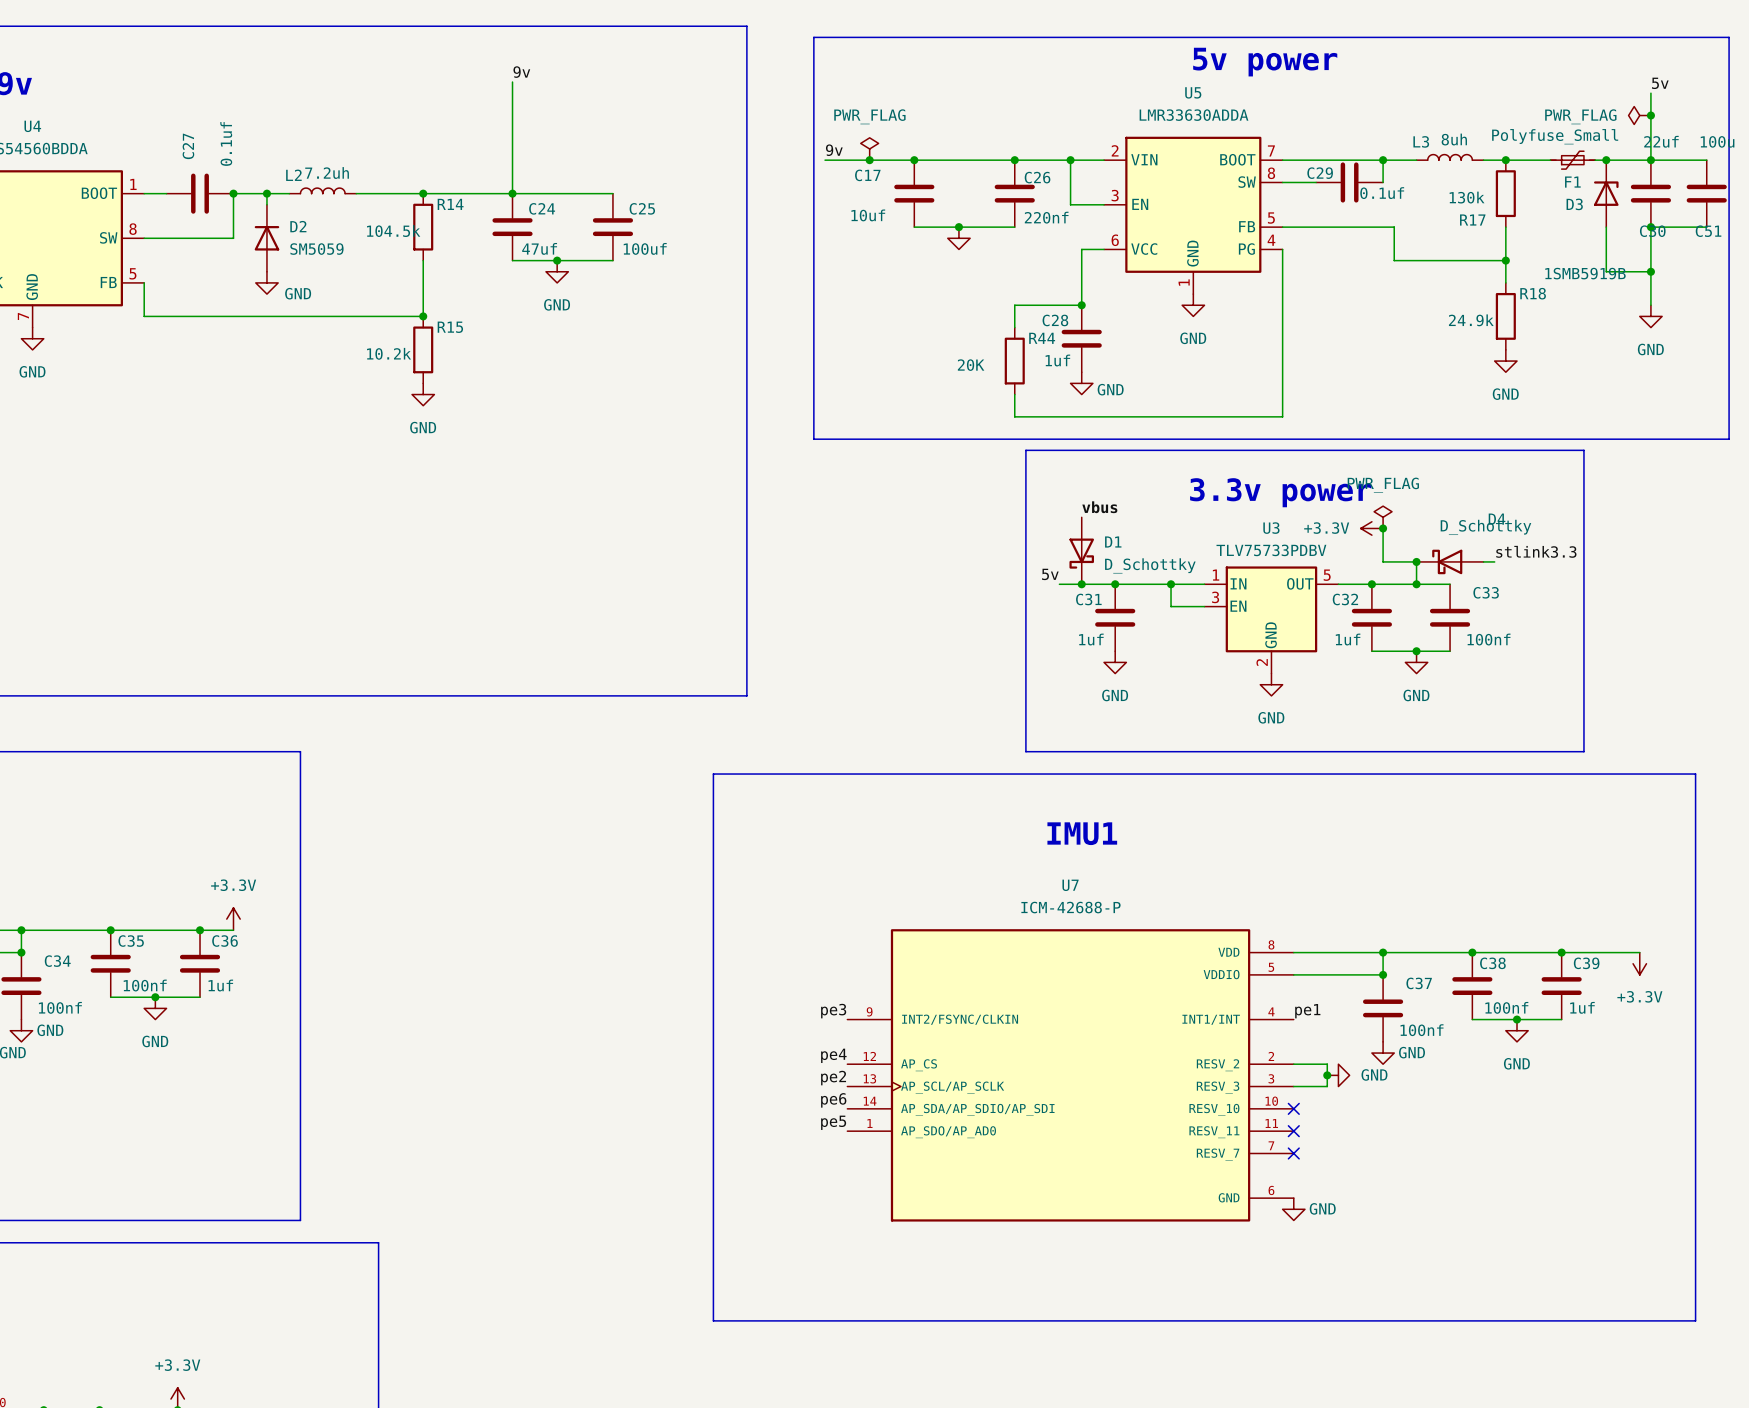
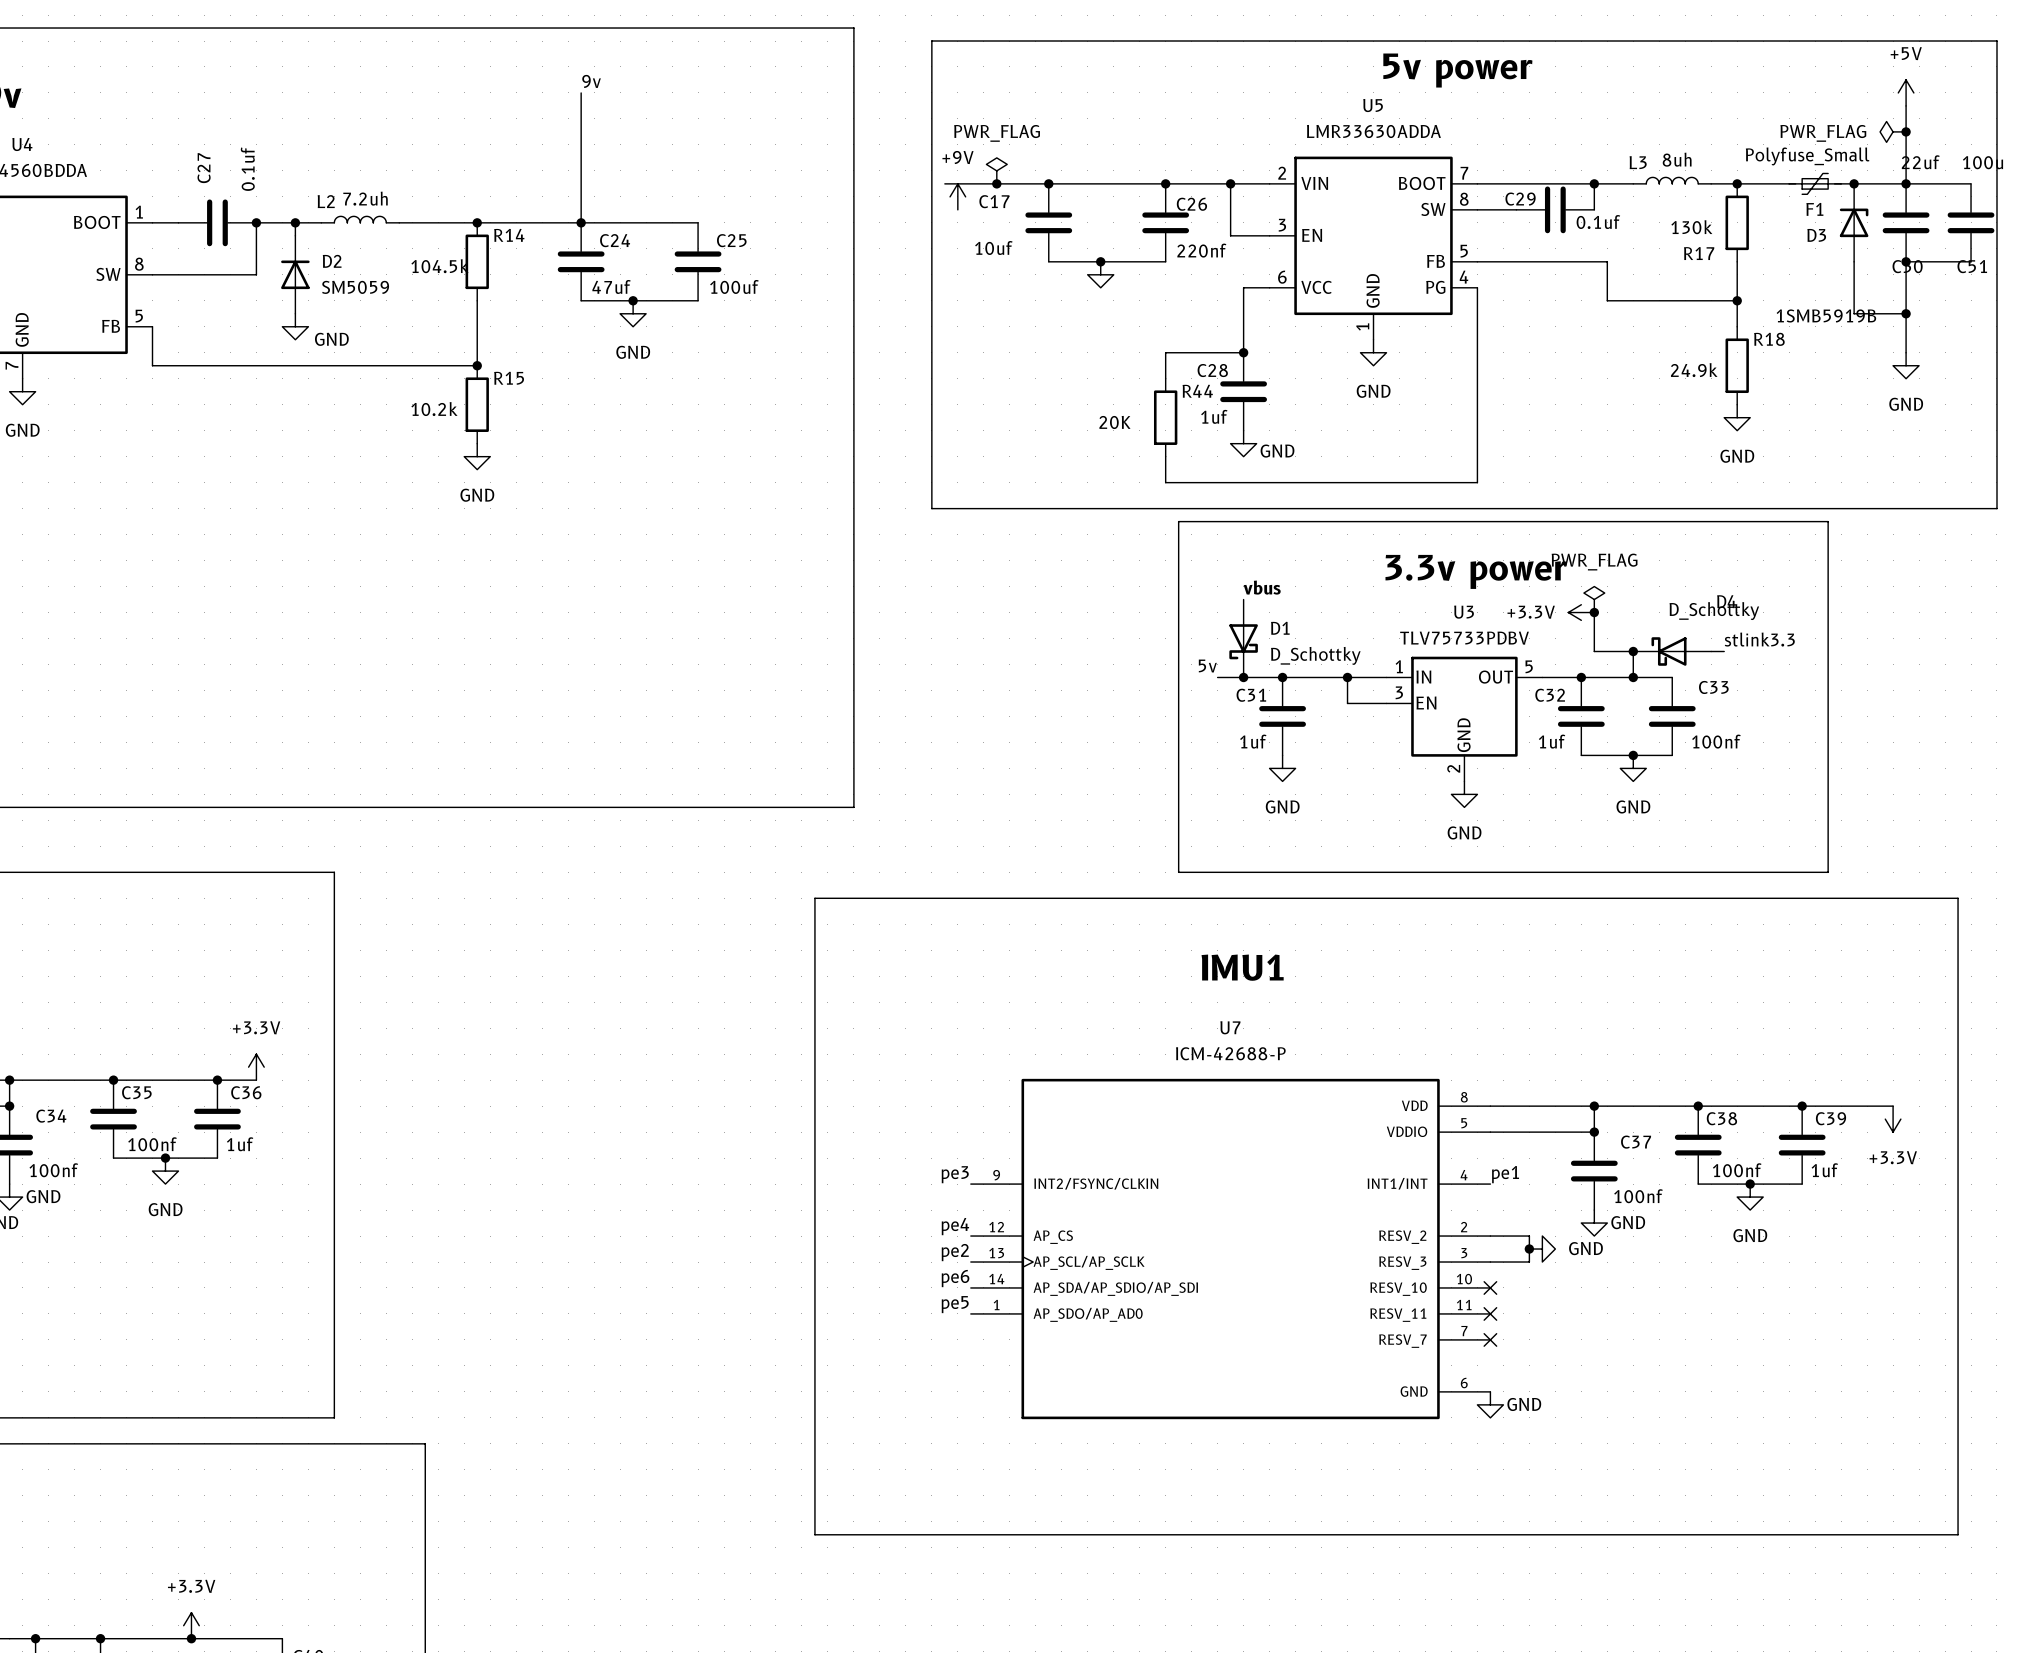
power symbol: none -> +5V (1906, 92)
label: 5v (1660, 83) -> none
label: 9v (834, 150) -> none
power symbol: none -> +9V (957, 196)

